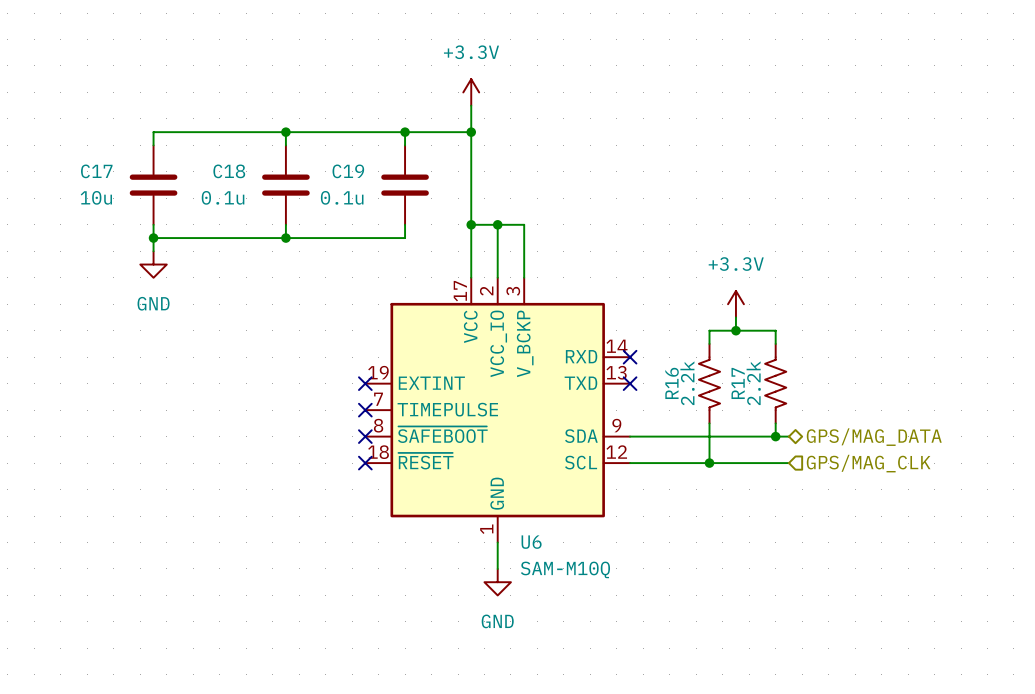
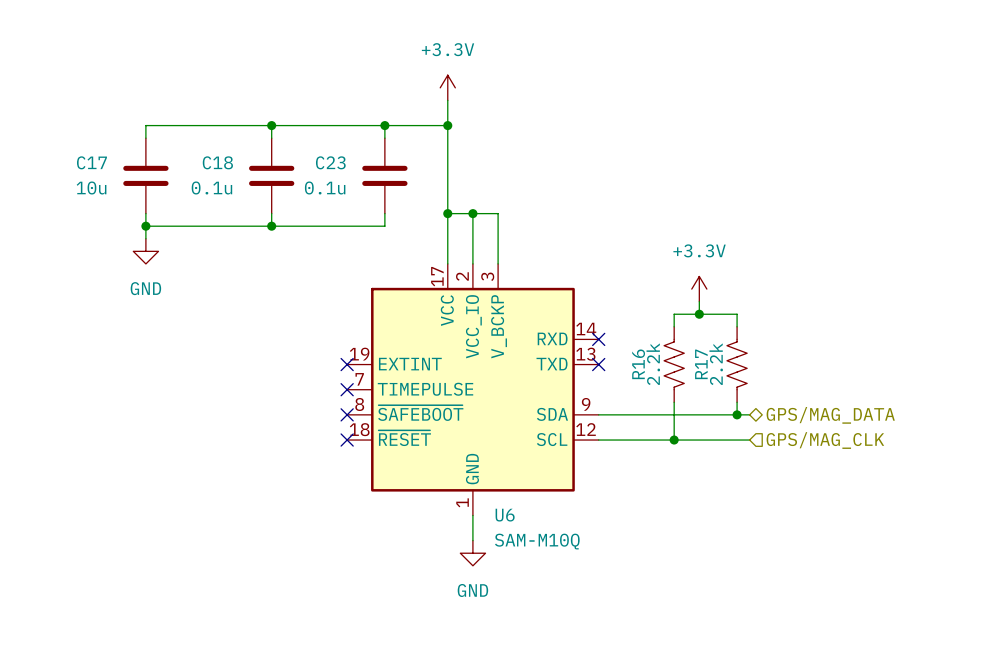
C19 name: C19 (348, 171) -> C23 (330, 162)

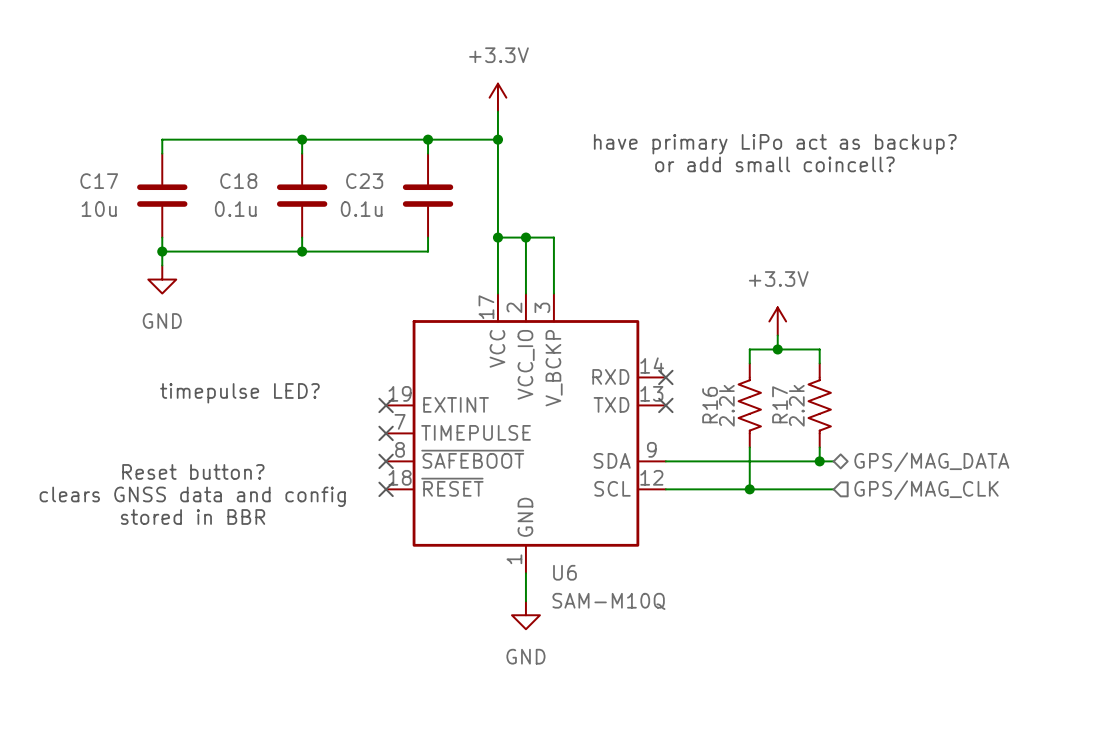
text: none -> have primary LiPo act as backup? (775, 144)
text: none -> or add small coincell? (774, 164)
text: none -> timepulse LED? (239, 393)
text: none -> Reset button? (193, 471)
text: none -> clears GNSS data and config (192, 496)
text: none -> stored in BBR (193, 516)

